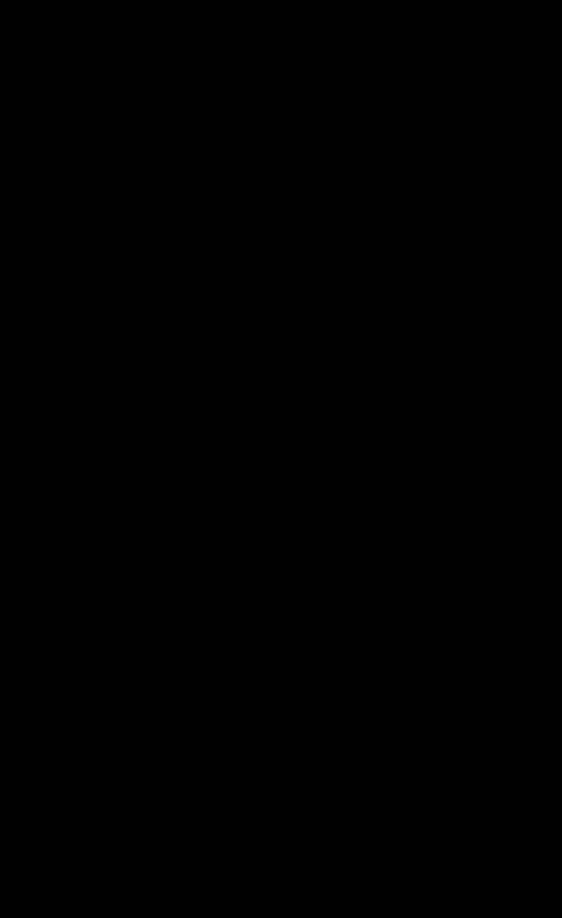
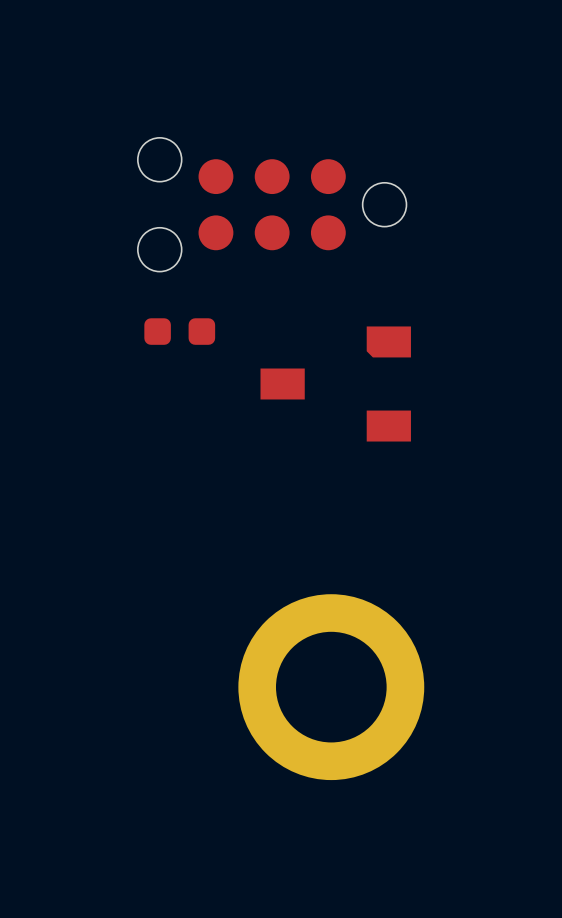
part: none -> (272, 204)
part: none -> (179, 331)
part: none -> (335, 383)
part: none -> (331, 687)

